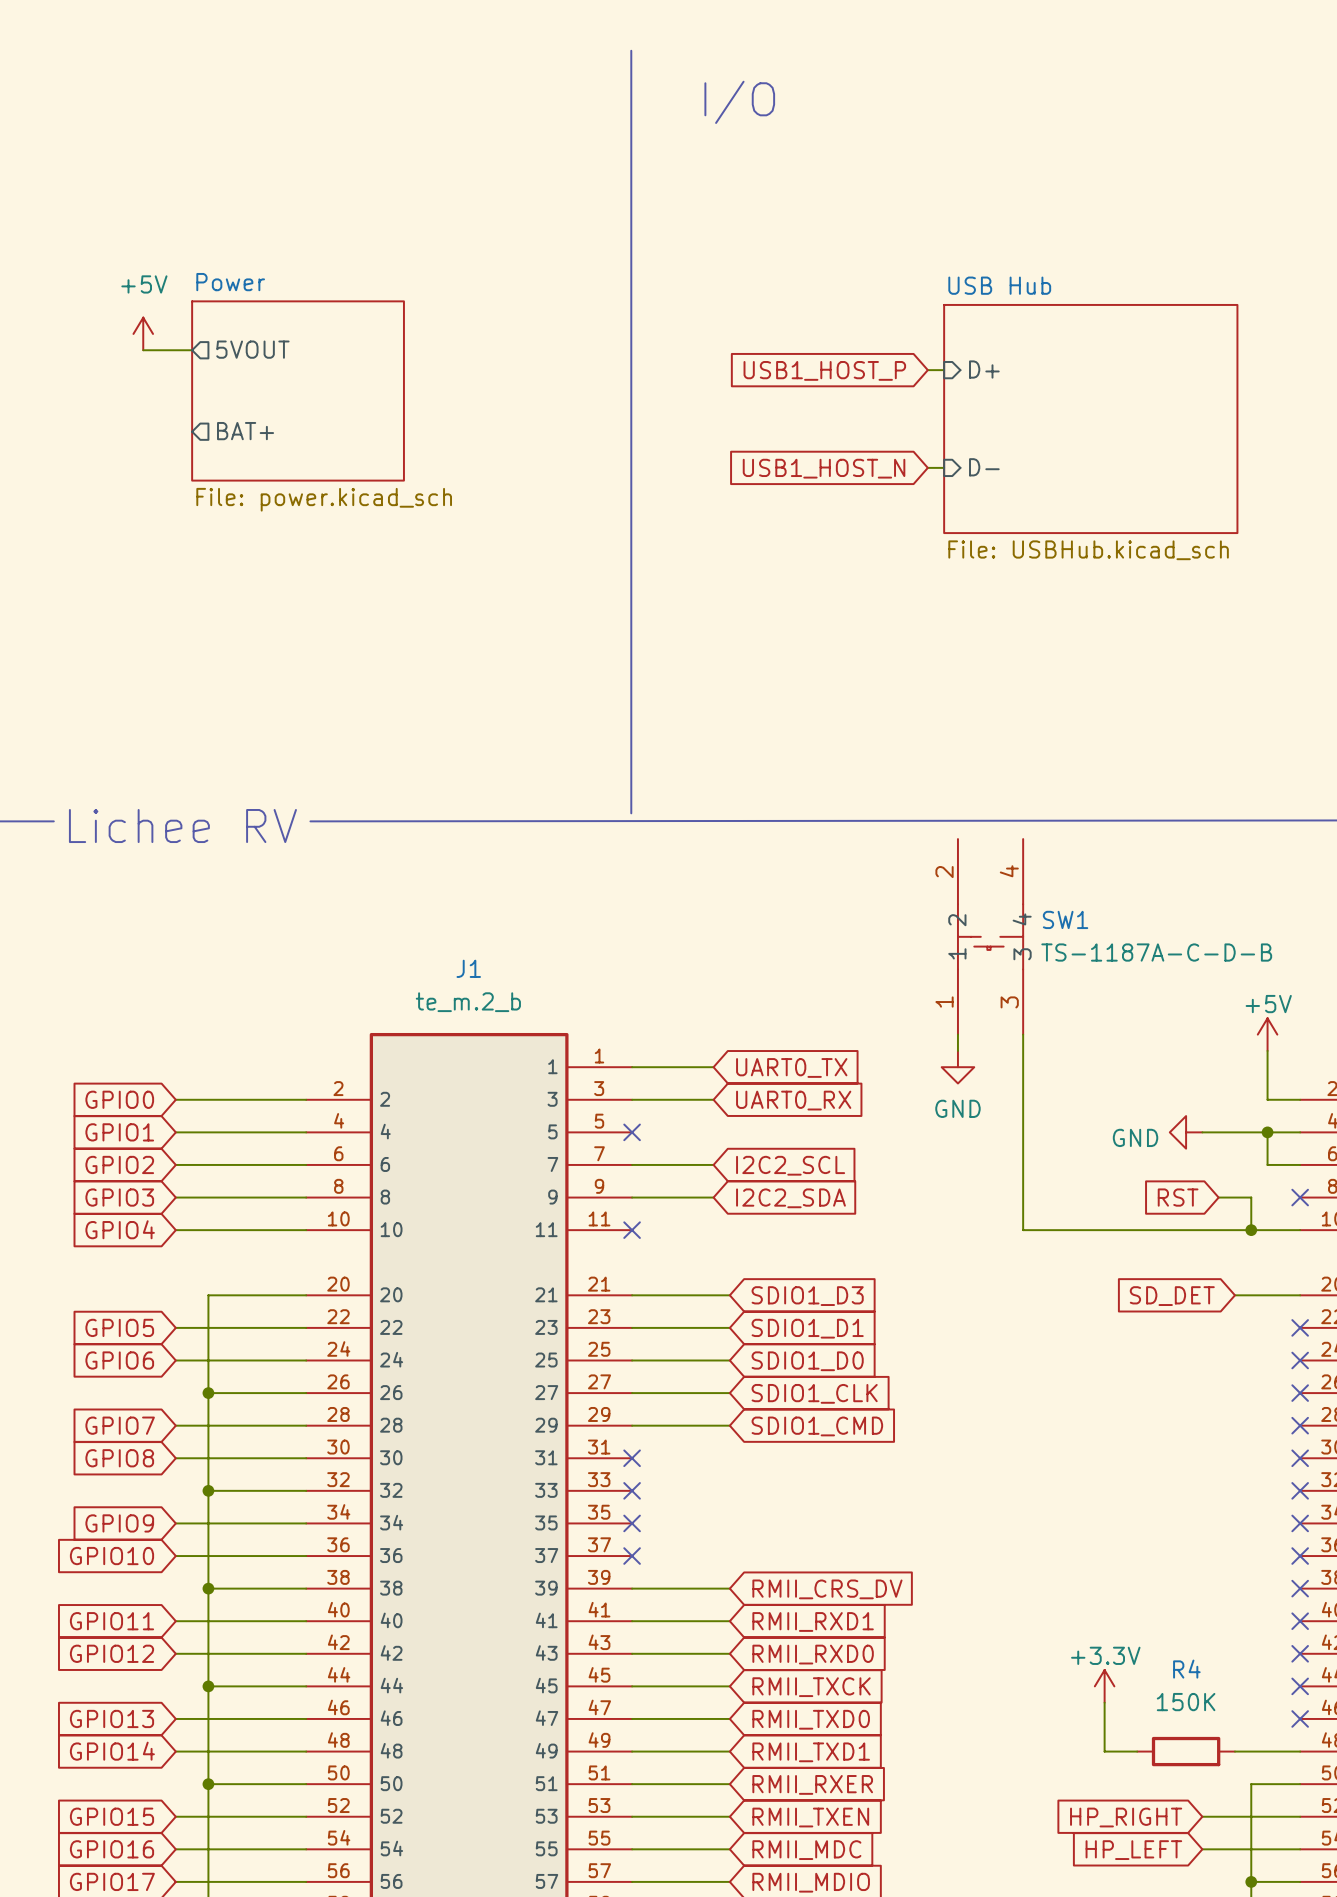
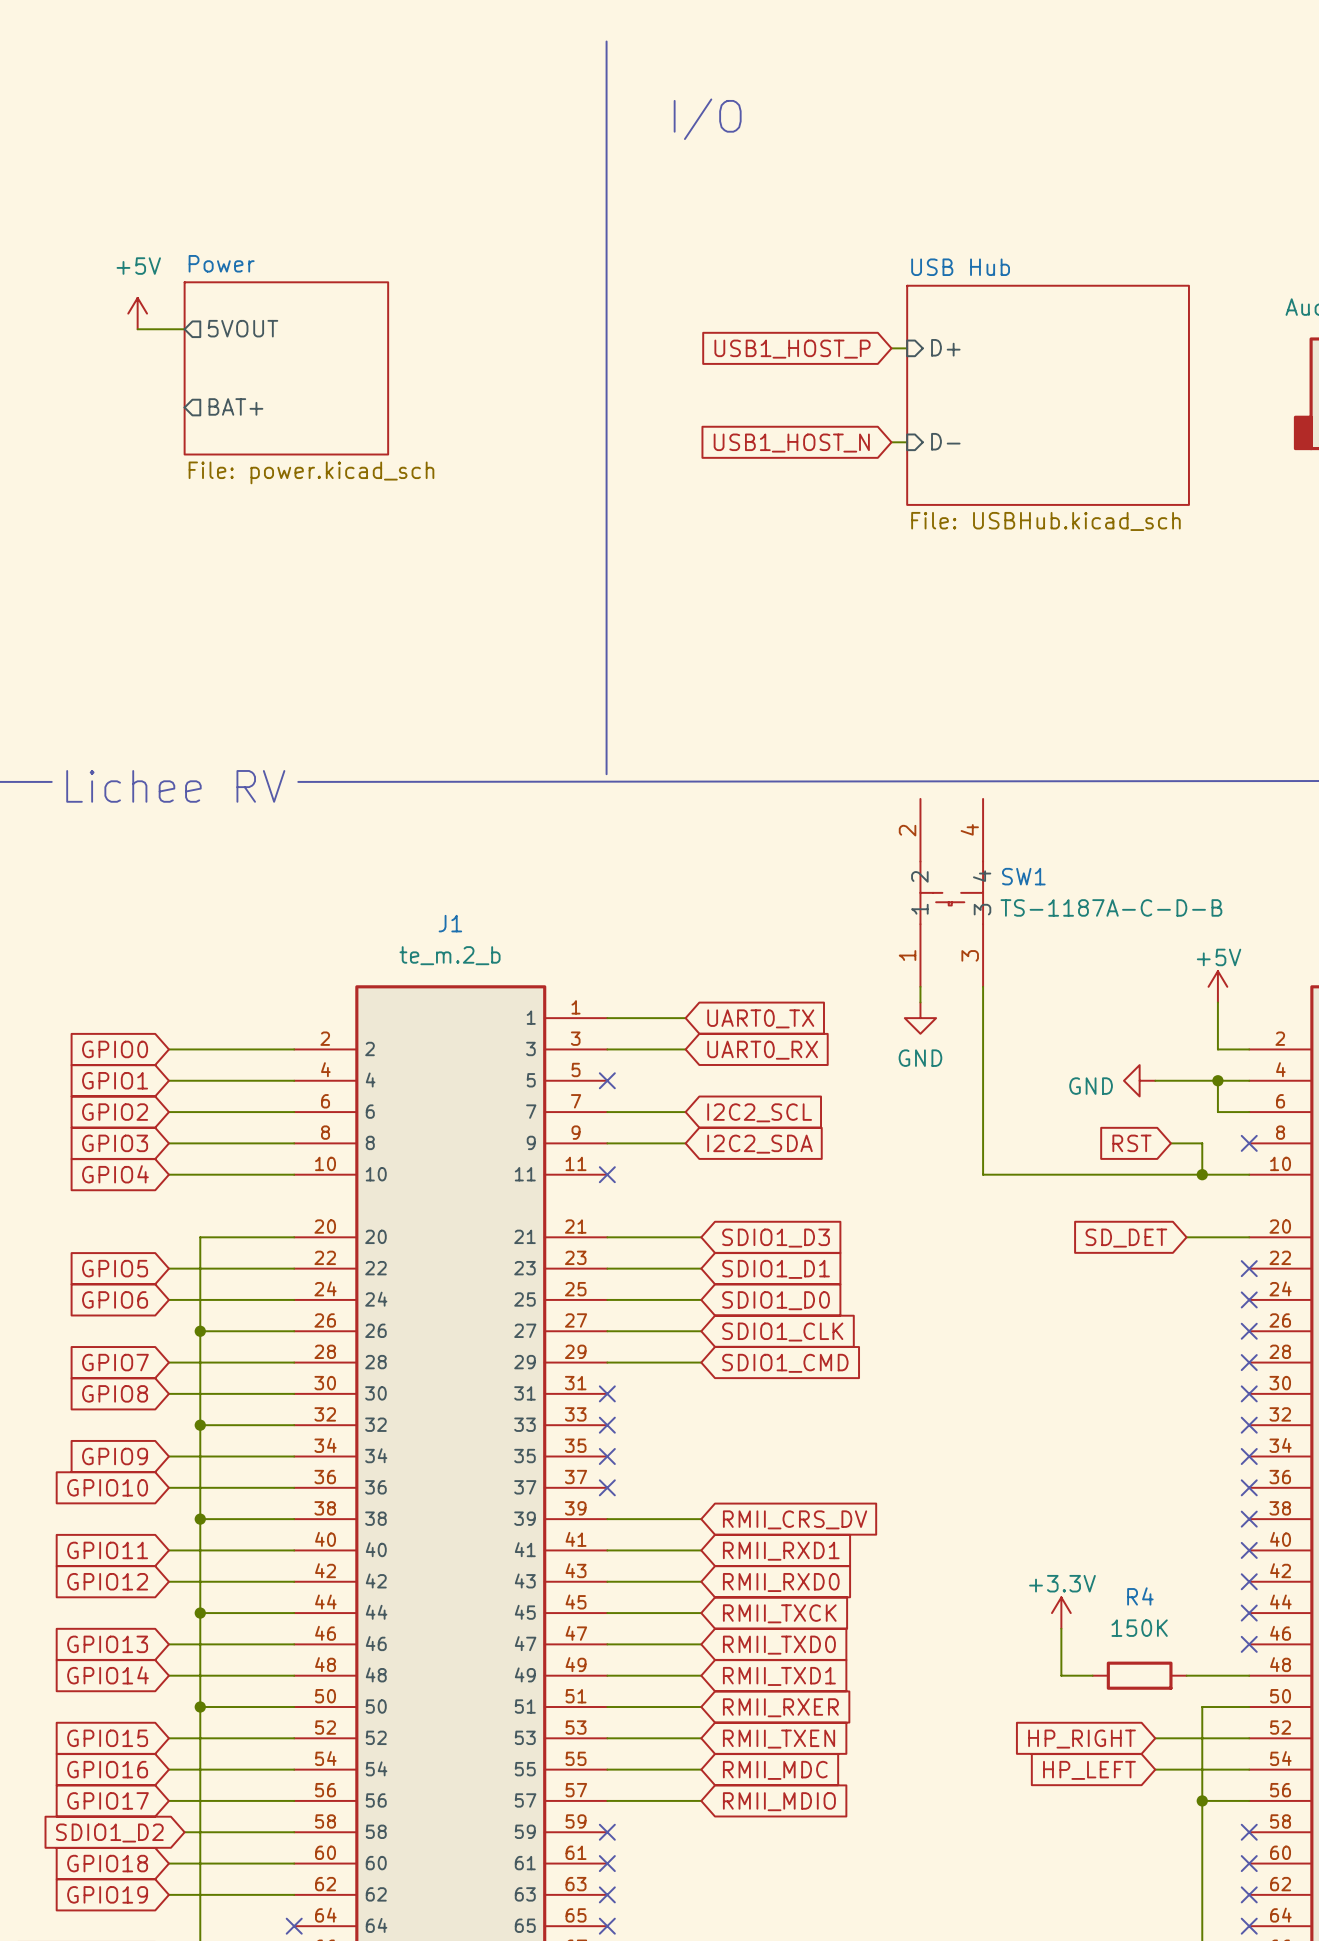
text position: I/O (739, 102) -> I/O (707, 119)

